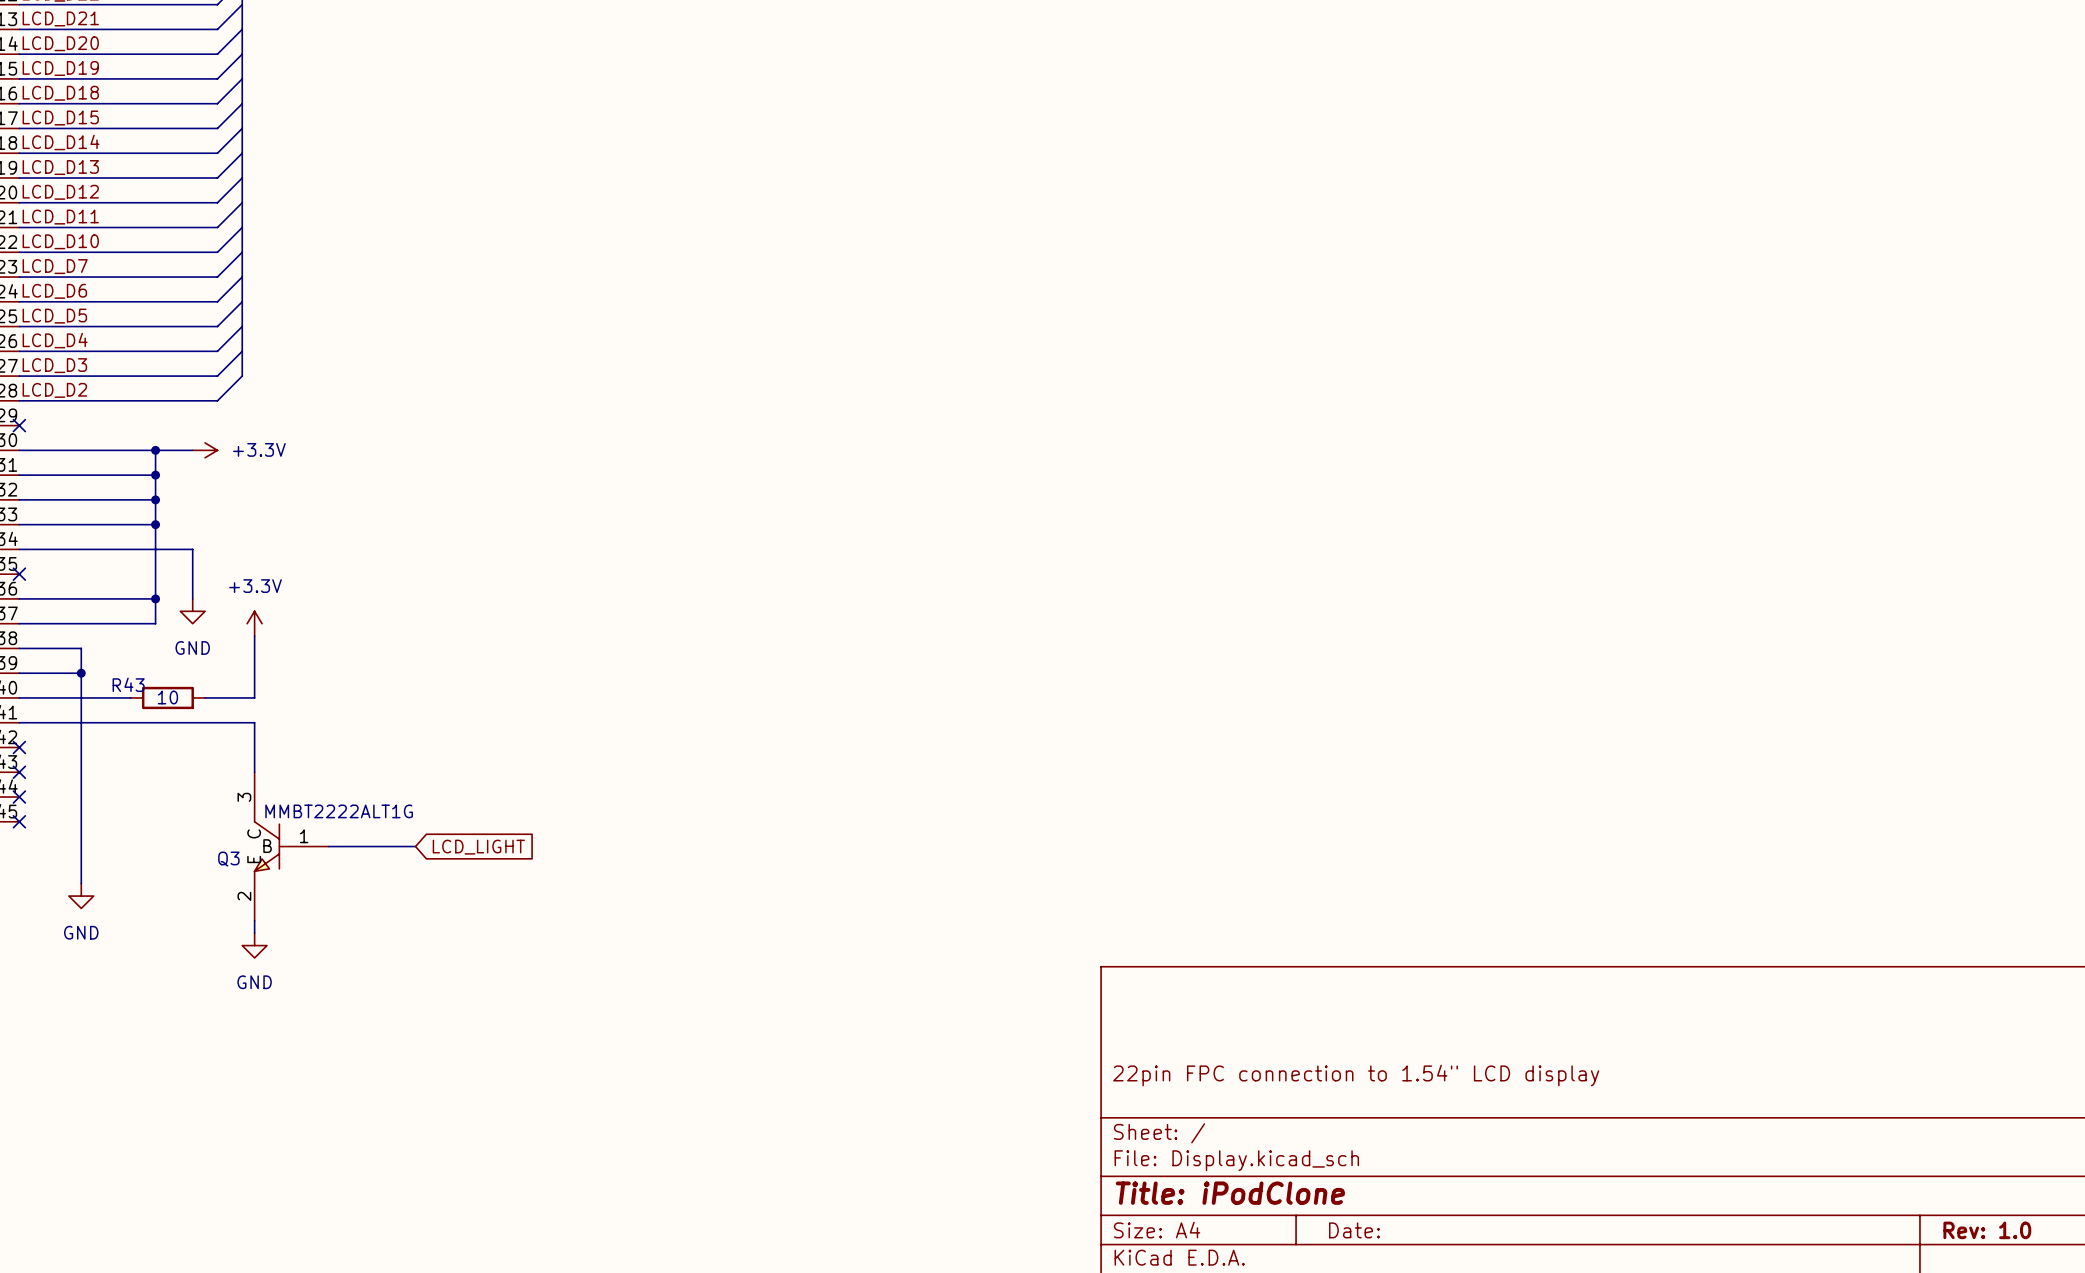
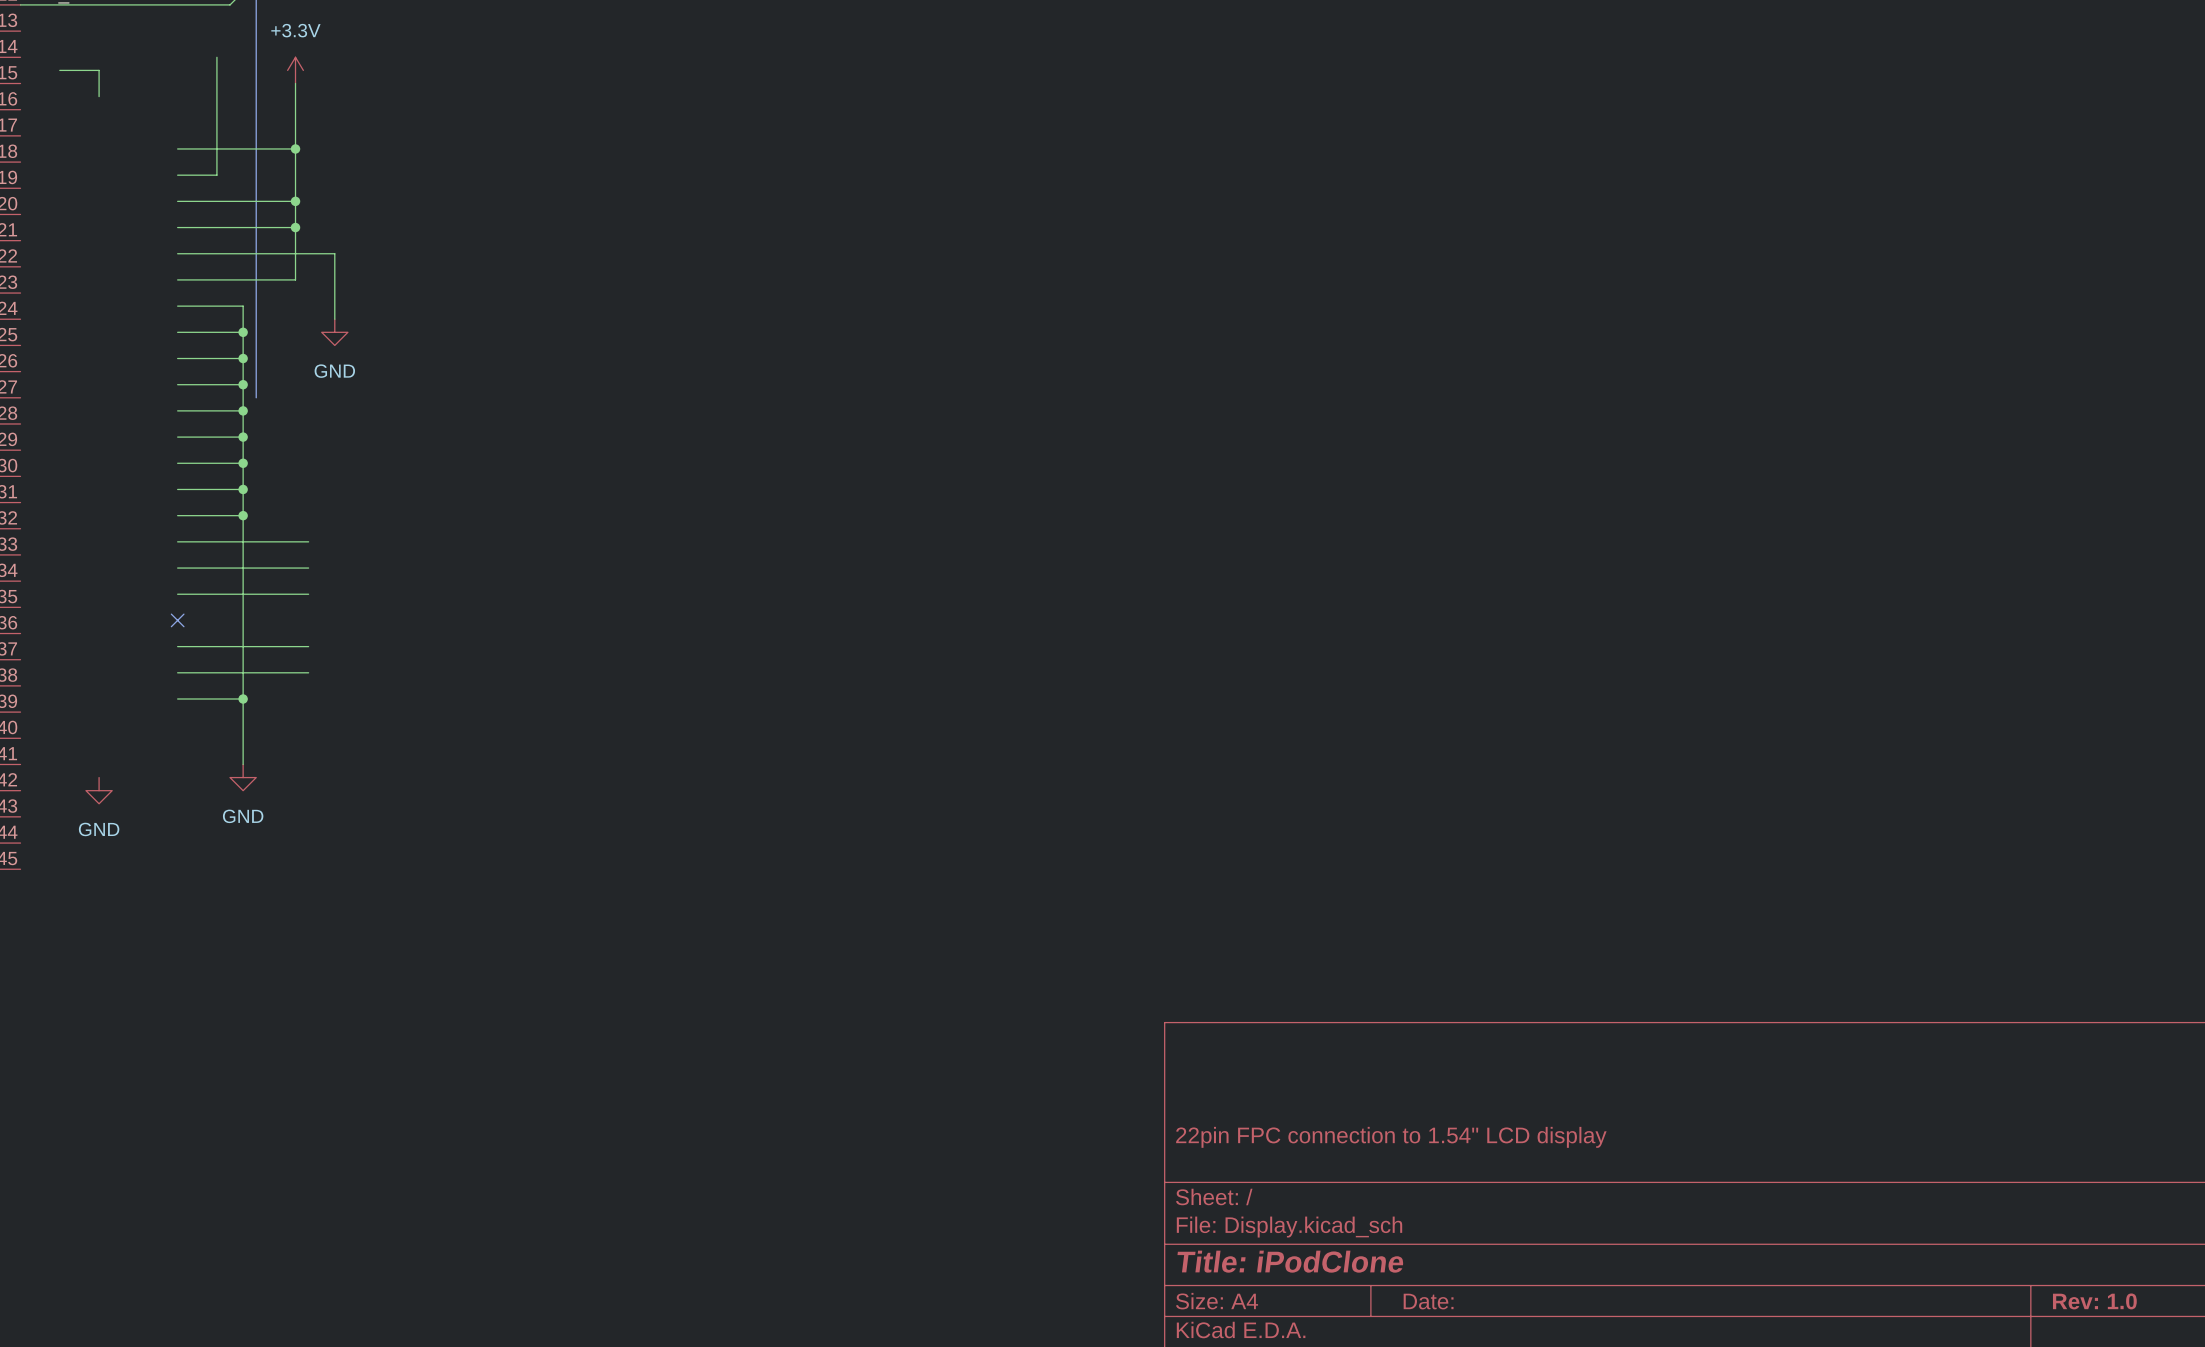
wire: (242, 4) (217, 29) (19, 29) -> none
label: LCD_D21 (60, 18) -> none
wire: (242, 29) (217, 54) (19, 54) -> none
label: LCD_D20 (60, 43) -> none
wire: none -> (216, 57) (216, 175) (177, 175)
wire: (242, 54) (217, 78) (19, 78) -> none
wire: none -> (59, 70) (99, 70) (99, 96)
power symbol: none -> +3.3V (295, 70)
label: LCD_D19 (60, 68) -> none
wire: (242, 78) (217, 103) (19, 103) -> none
wire: none -> (295, 83) (295, 279) (177, 279)
label: LCD_D18 (60, 93) -> none
wire: (242, 103) (217, 128) (19, 128) -> none
label: LCD_D15 (60, 118) -> none
wire: (242, 128) (217, 153) (19, 153) -> none
wire: none -> (177, 148) (295, 148)
junction: none -> (295, 148)
label: LCD_D14 (61, 142) -> none
wire: (242, 153) (217, 177) (19, 177) -> none
label: LCD_D13 (60, 167) -> none
wire: (242, 177) (217, 202) (19, 202) -> none
wire: none -> (177, 201) (295, 201)
junction: none -> (295, 201)
label: LCD_D12 (60, 192) -> none
wire: (242, 202) (217, 227) (19, 227) -> none
wire: none -> (177, 227) (295, 227)
junction: none -> (295, 227)
label: LCD_D11 (60, 217) -> none
wire: (242, 227) (217, 252) (19, 252) -> none
wire: none -> (177, 253) (334, 253) (334, 319)
label: LCD_D10 (60, 241) -> none
wire: (242, 252) (217, 277) (19, 277) -> none
label: LCD_D7 (55, 266) -> none
wire: (242, 277) (217, 301) (19, 301) -> none
wire: none -> (177, 306) (243, 306) (243, 764)
label: LCD_D6 (54, 291) -> none
wire: (242, 301) (217, 326) (19, 326) -> none
wire: none -> (177, 332) (243, 332)
junction: none -> (243, 332)
power symbol: none -> GND (334, 332)
label: LCD_D5 (54, 316) -> none
wire: (242, 326) (217, 351) (19, 351) -> none
wire: none -> (177, 358) (243, 358)
junction: none -> (243, 358)
label: LCD_D4 (55, 340) -> none
wire: (242, 351) (217, 376) (19, 376) -> none
wire: none -> (177, 384) (243, 384)
junction: none -> (243, 384)
label: LCD_D3 (54, 365) -> none
wire: (242, 376) (217, 400) (19, 400) -> none
wire: none -> (177, 410) (243, 410)
junction: none -> (243, 410)
label: LCD_D2 (54, 390) -> none
wire: none -> (177, 437) (243, 437)
junction: none -> (243, 437)
no-connect mark: (19, 425) -> none
wire: none -> (177, 463) (243, 463)
junction: none -> (243, 463)
wire: (19, 450) (192, 450) -> none
wire: (155, 450) (155, 623) (19, 623) -> none
junction: (155, 450) -> none
power symbol: +3.3V (205, 450) -> none
wire: none -> (177, 489) (243, 489)
junction: none -> (243, 489)
wire: (19, 475) (155, 475) -> none
junction: (155, 475) -> none
wire: none -> (177, 515) (243, 515)
junction: none -> (243, 515)
wire: (19, 499) (155, 499) -> none
junction: (155, 499) -> none
wire: none -> (177, 541) (308, 541)
wire: (19, 524) (155, 524) -> none
junction: (155, 524) -> none
wire: none -> (177, 568) (308, 568)
wire: (19, 549) (192, 549) (192, 598) -> none
wire: none -> (177, 594) (308, 594)
no-connect mark: (19, 574) -> none
no-connect mark: none -> (177, 620)
wire: (19, 598) (155, 598) -> none
junction: (155, 598) -> none
wire: none -> (177, 646) (308, 646)
power symbol: GND (192, 611) -> none
power symbol: +3.3V (254, 623) -> none
wire: none -> (177, 672) (308, 672)
wire: (254, 636) (254, 697) (205, 697) -> none
wire: (19, 648) (81, 648) (81, 883) -> none
junction: none -> (243, 699)
wire: (19, 673) (81, 673) -> (177, 699) (243, 699)
junction: (81, 673) -> none
wire: (19, 697) (130, 697) -> none
R43: 10 (167, 697) -> none
wire: (19, 722) (254, 722) (254, 772) -> none
power symbol: none -> GND (243, 777)
no-connect mark: (19, 747) -> none
power symbol: none -> GND (99, 790)
no-connect mark: (19, 772) -> none
no-connect mark: (19, 797) -> none
no-connect mark: (19, 821) -> none
Q3: MMBT2222ALT1G (291, 846) -> none
wire: (328, 846) (415, 846) -> none
global label: LCD_LIGHT (478, 847) -> none
power symbol: GND (81, 896) -> none
wire: (254, 920) (254, 933) -> none
power symbol: GND (254, 945) -> none

